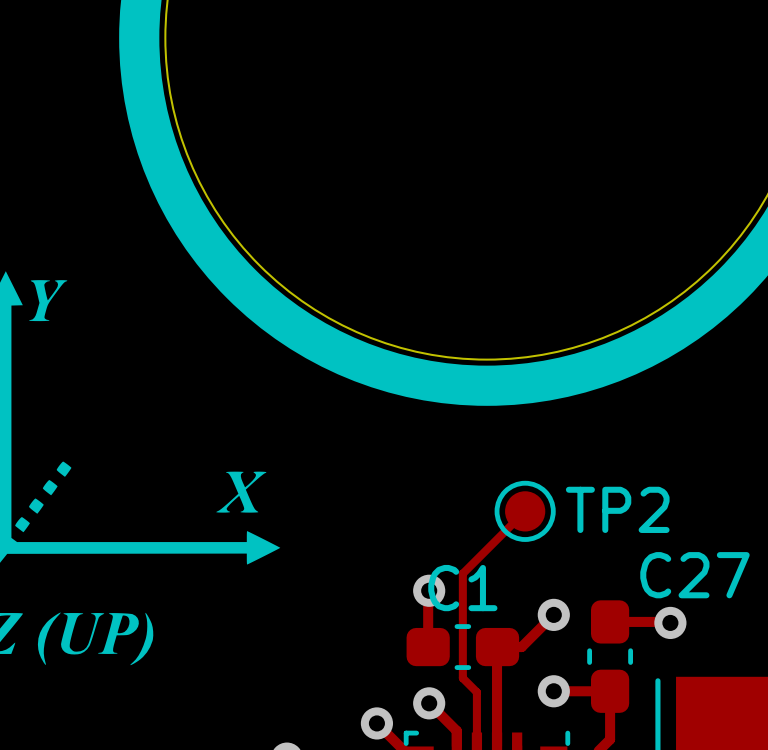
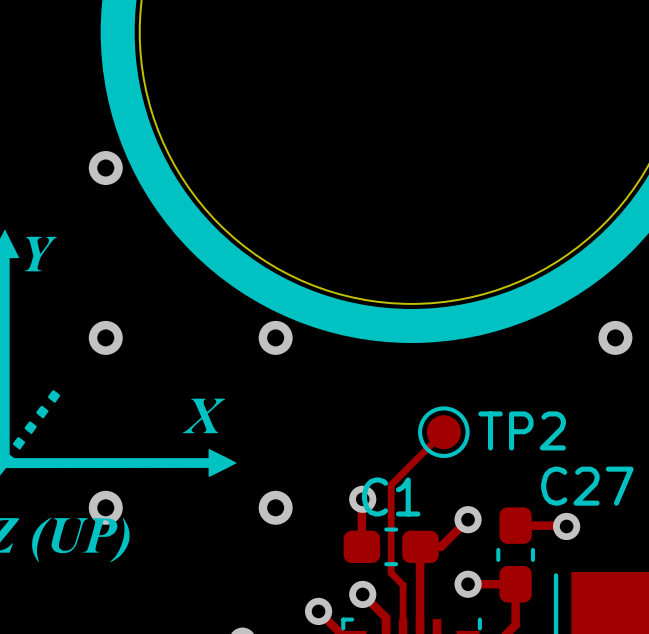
via: none -> (105, 168)
via: none -> (105, 337)
via: none -> (275, 337)
via: none -> (615, 337)
via: none -> (105, 507)
via: none -> (275, 507)

